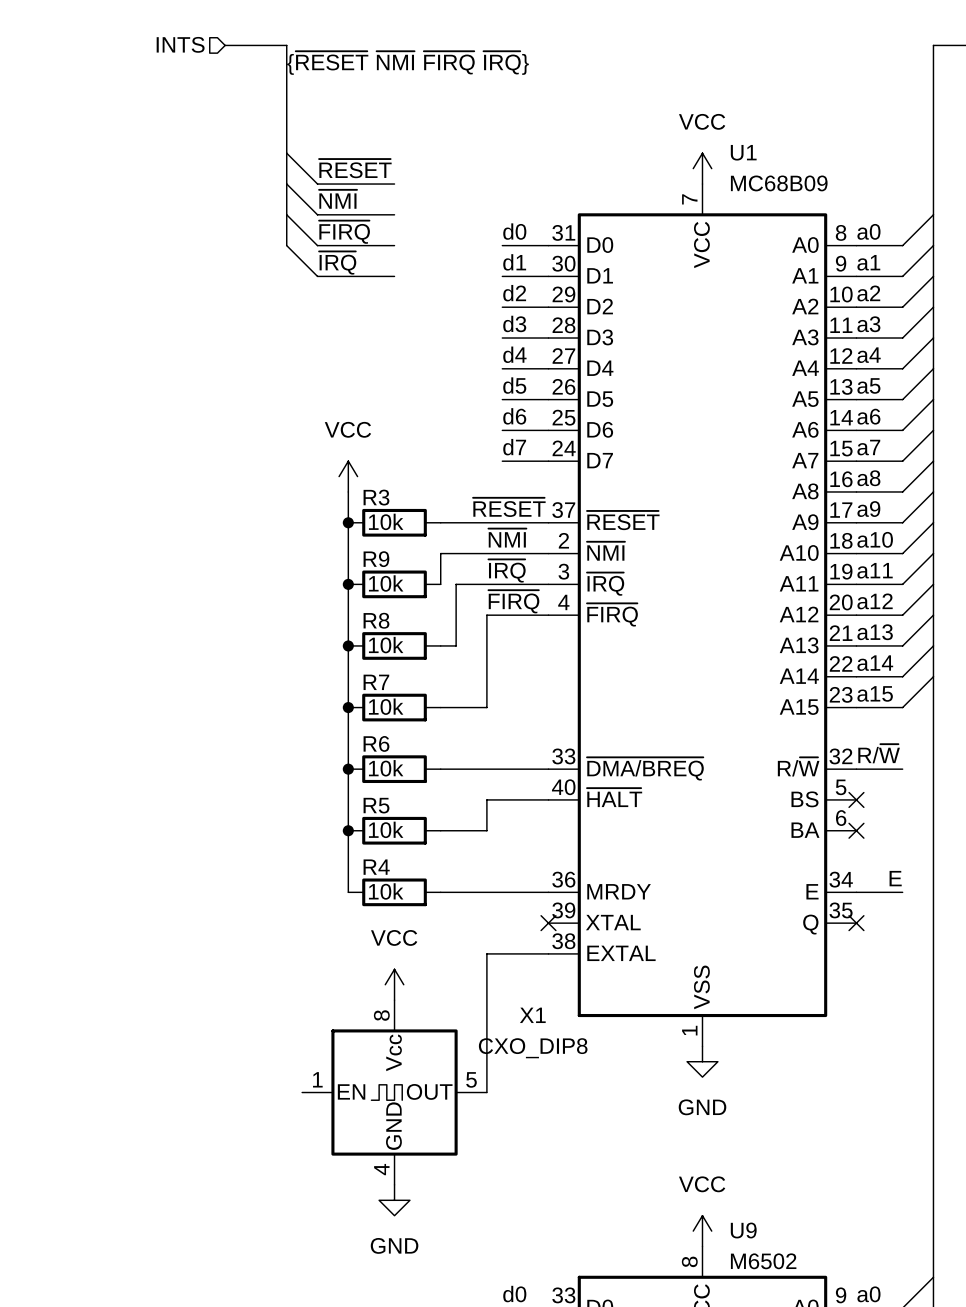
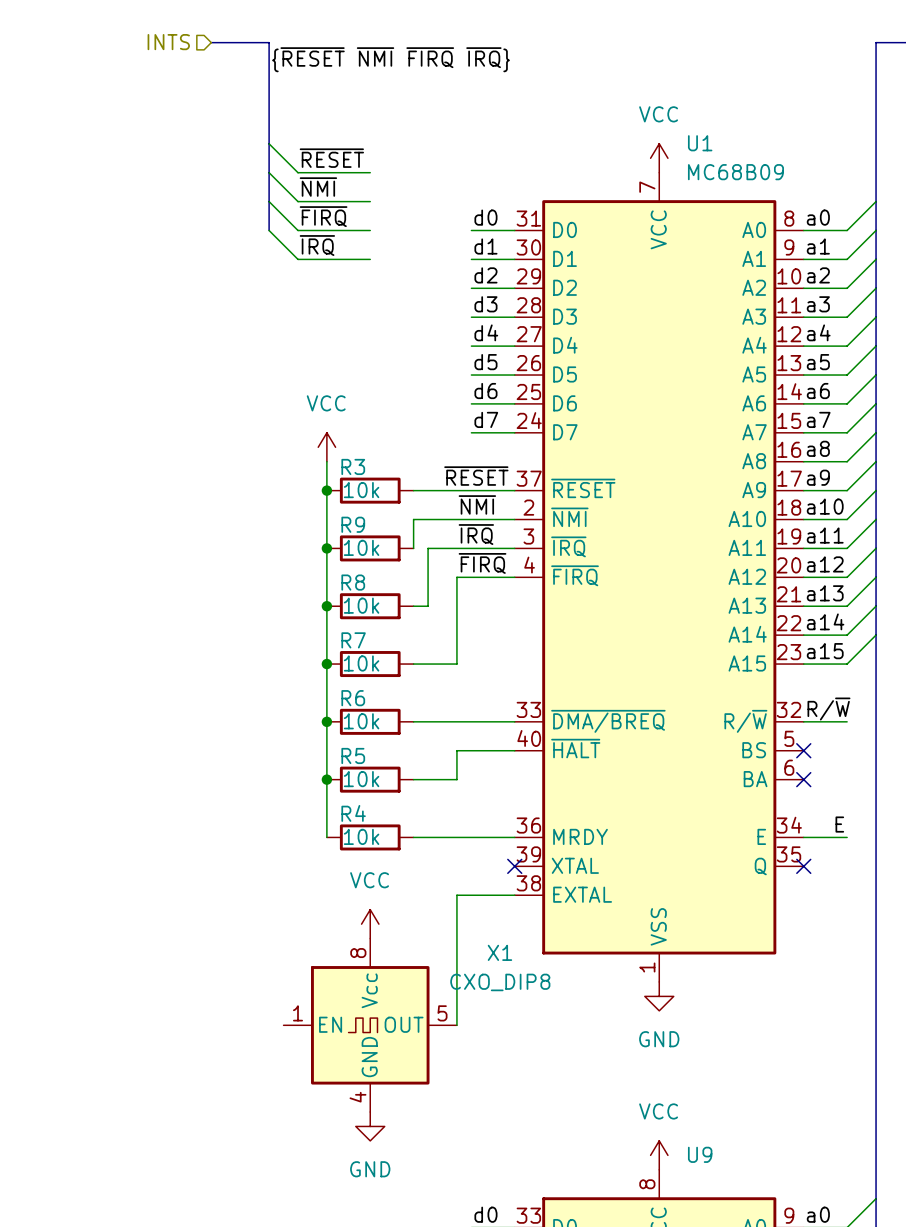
U9 value: M6502 (763, 1261) -> none

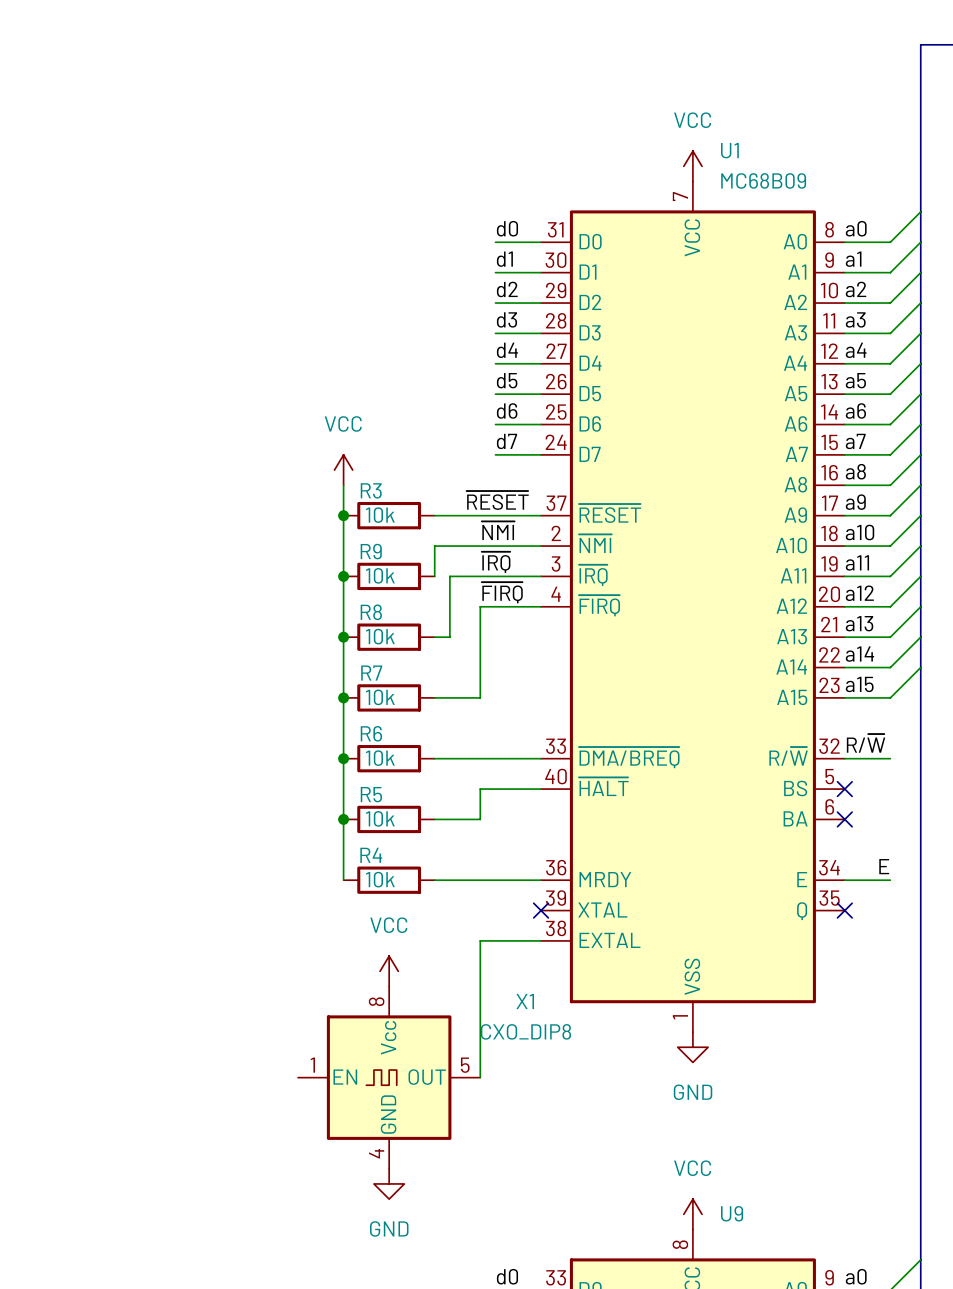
hierarchical label: INTS (168, 42) -> none
bus: (211, 42) (269, 42) (269, 230) -> none
label: {~{RESET} ~{NMI} ~{FIRQ} ~{IRQ}} (391, 59) -> none
wire: (269, 143) (298, 172) (370, 172) -> none
label: ~{RESET} (331, 158) -> none
wire: (269, 172) (298, 201) (370, 201) -> none
label: ~{NMI} (318, 187) -> none
wire: (269, 201) (298, 230) (370, 230) -> none
label: ~{FIRQ} (323, 216) -> none
wire: (269, 230) (298, 259) (370, 259) -> none
label: ~{IRQ} (317, 245) -> none

